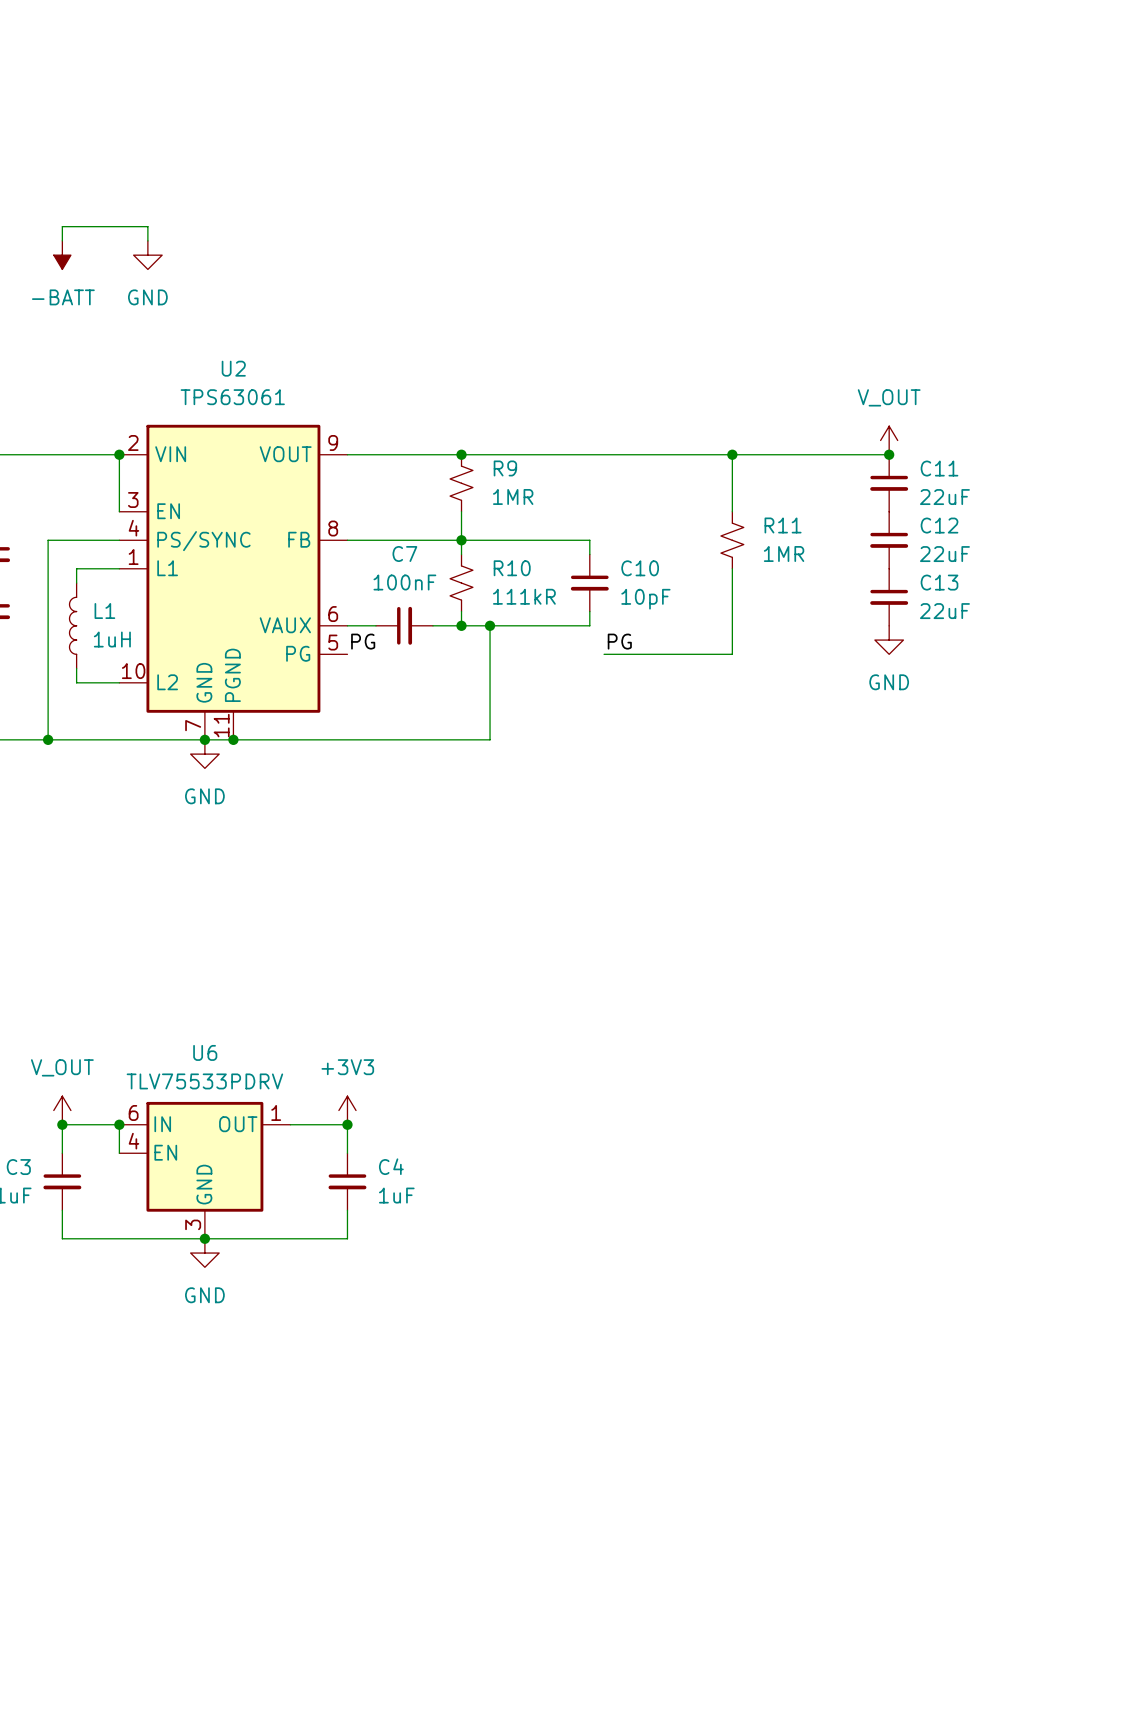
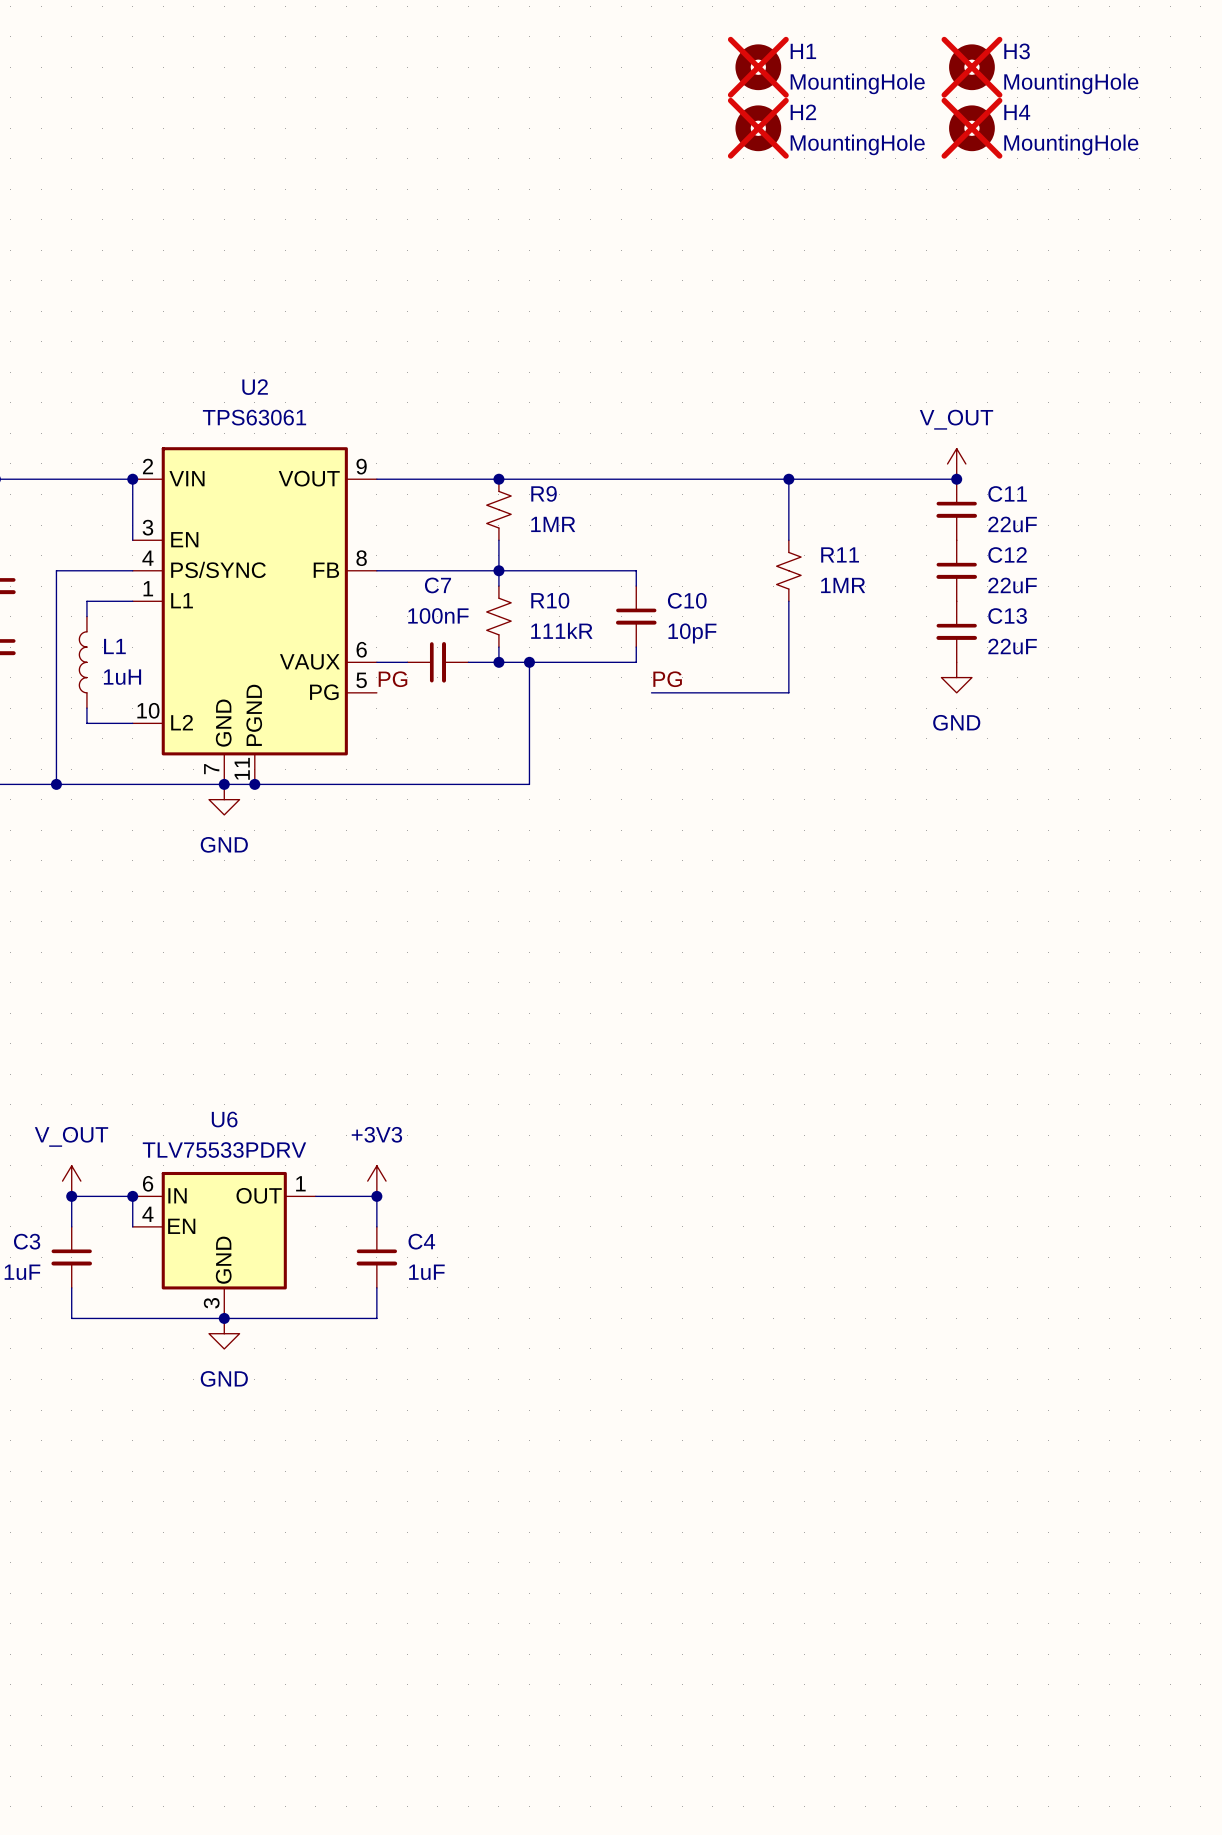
H1: none -> MountingHole (758, 67)
H3: none -> MountingHole (971, 67)
H2: none -> MountingHole (758, 128)
H4: none -> MountingHole (971, 128)
wire: (62, 240) (62, 226) (147, 226) (147, 240) -> none
power symbol: -BATT (62, 255) -> none
power symbol: GND (147, 255) -> none

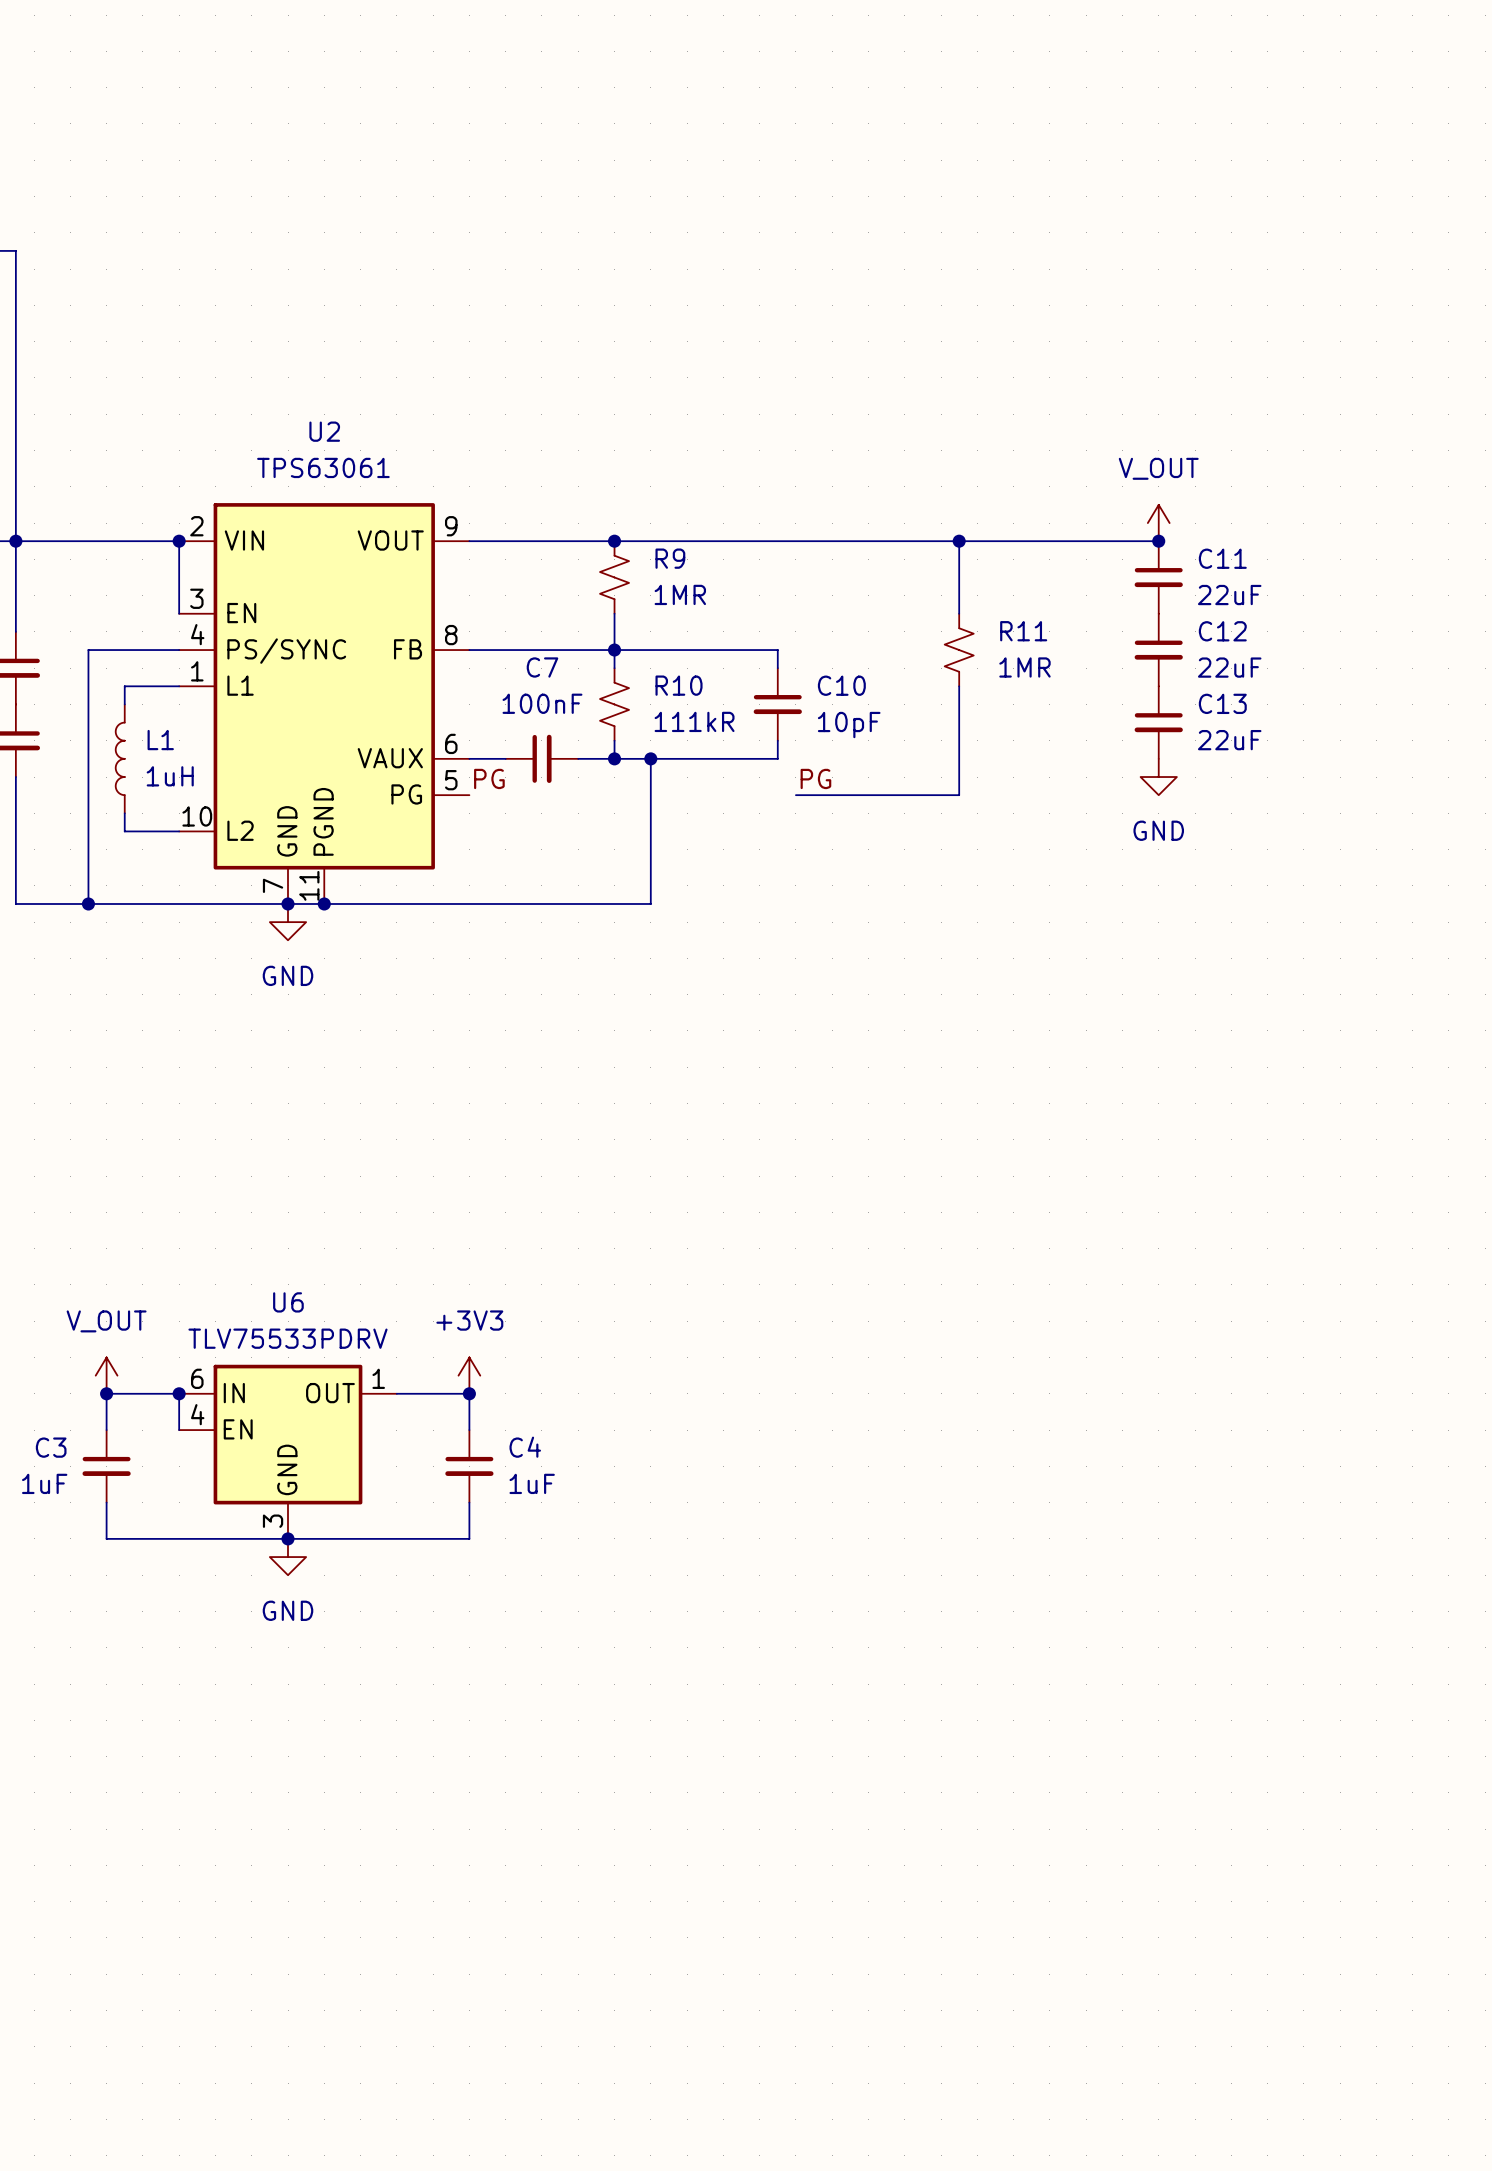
H1: MountingHole (758, 67) -> none
H3: MountingHole (971, 67) -> none
H2: MountingHole (758, 128) -> none
H4: MountingHole (971, 128) -> none

